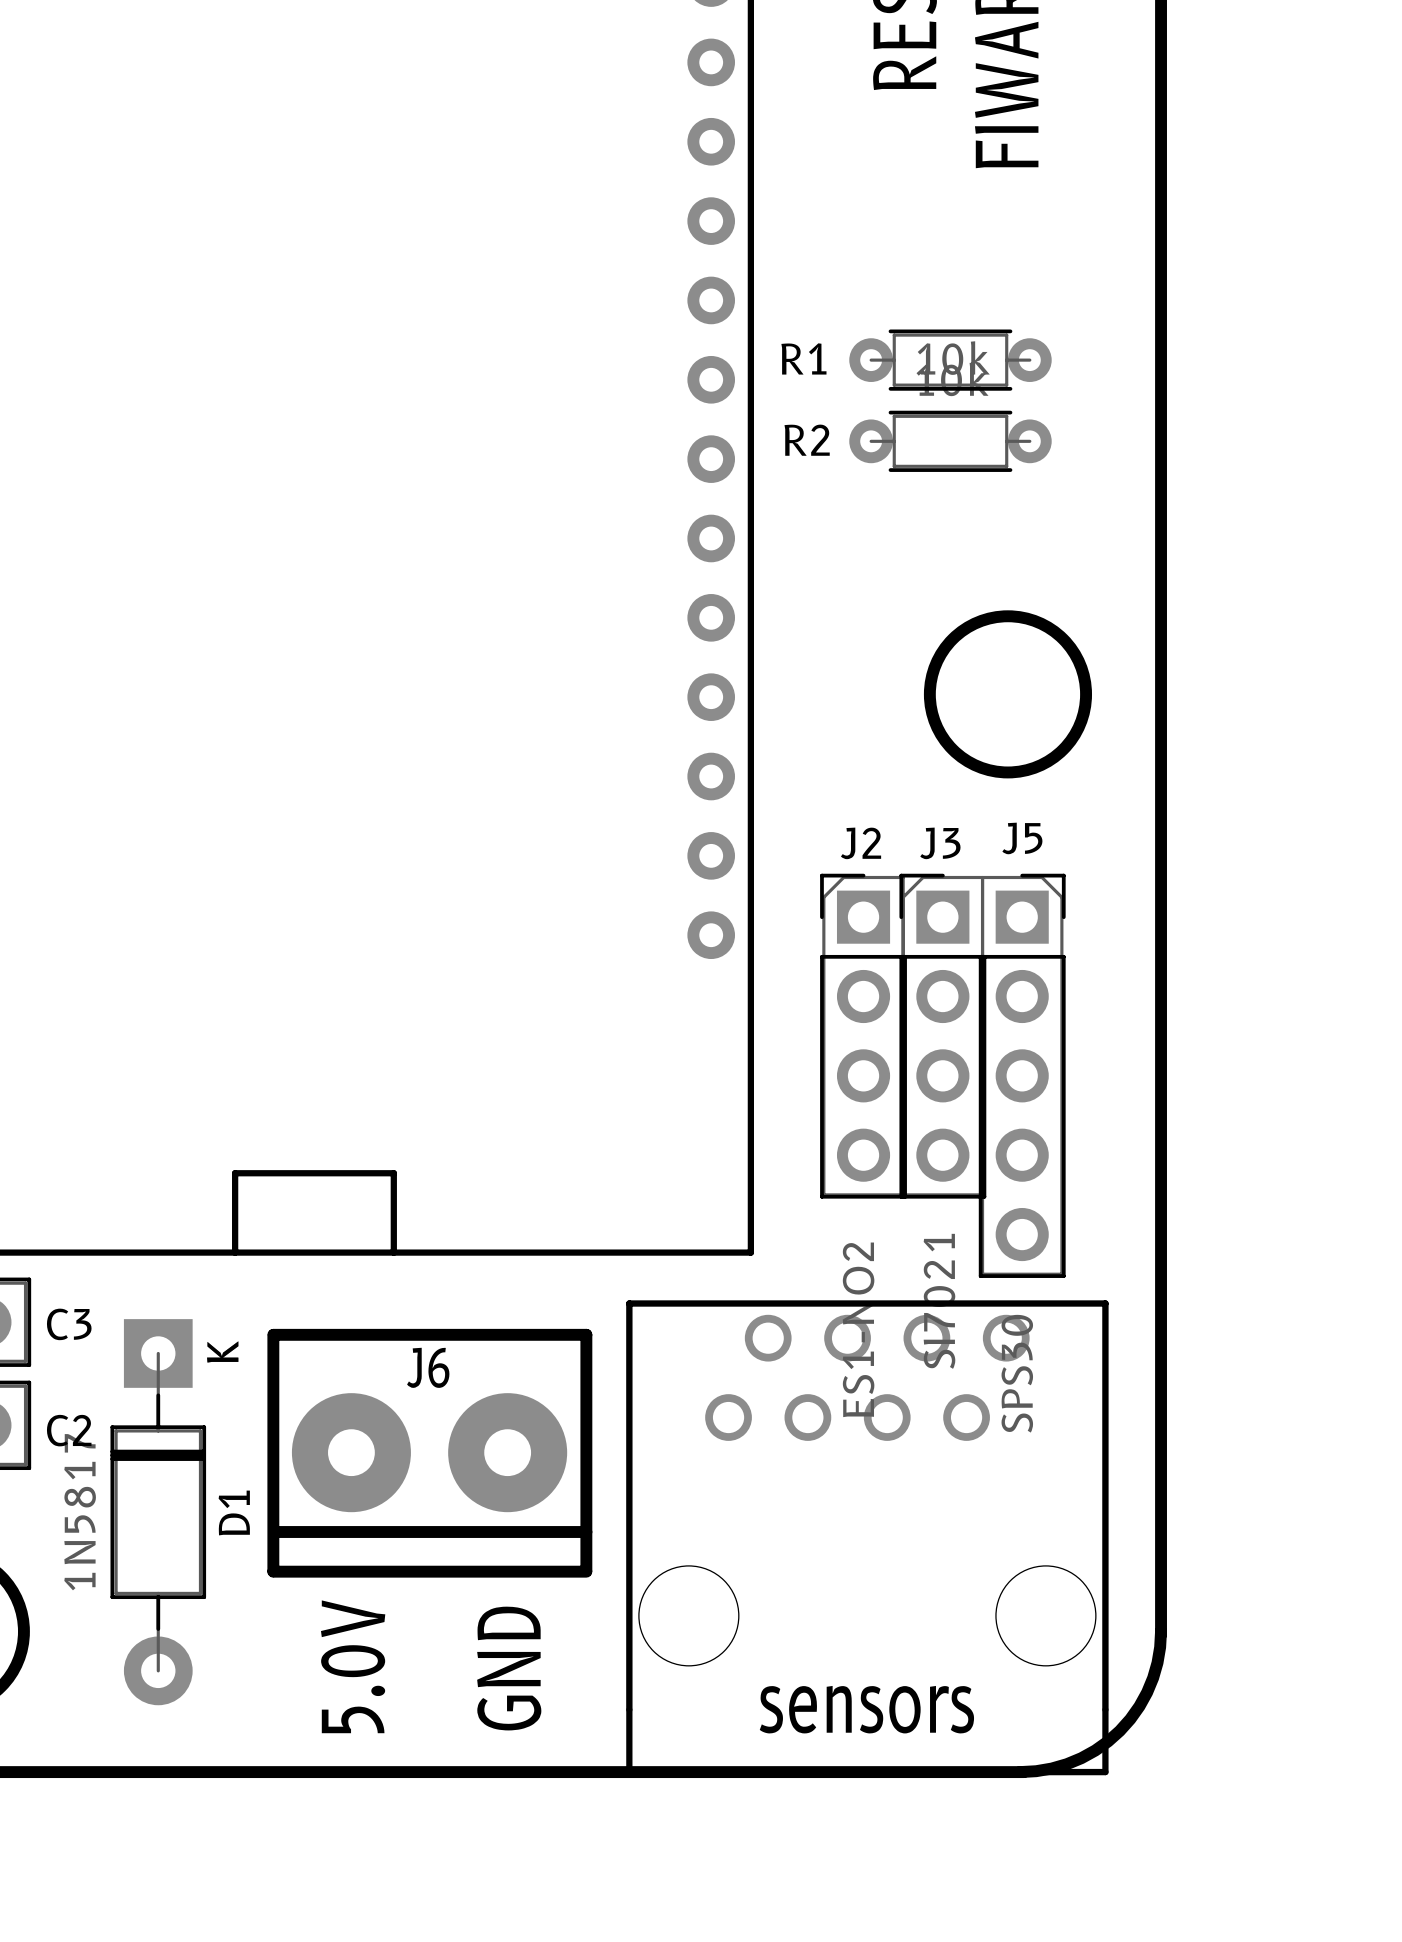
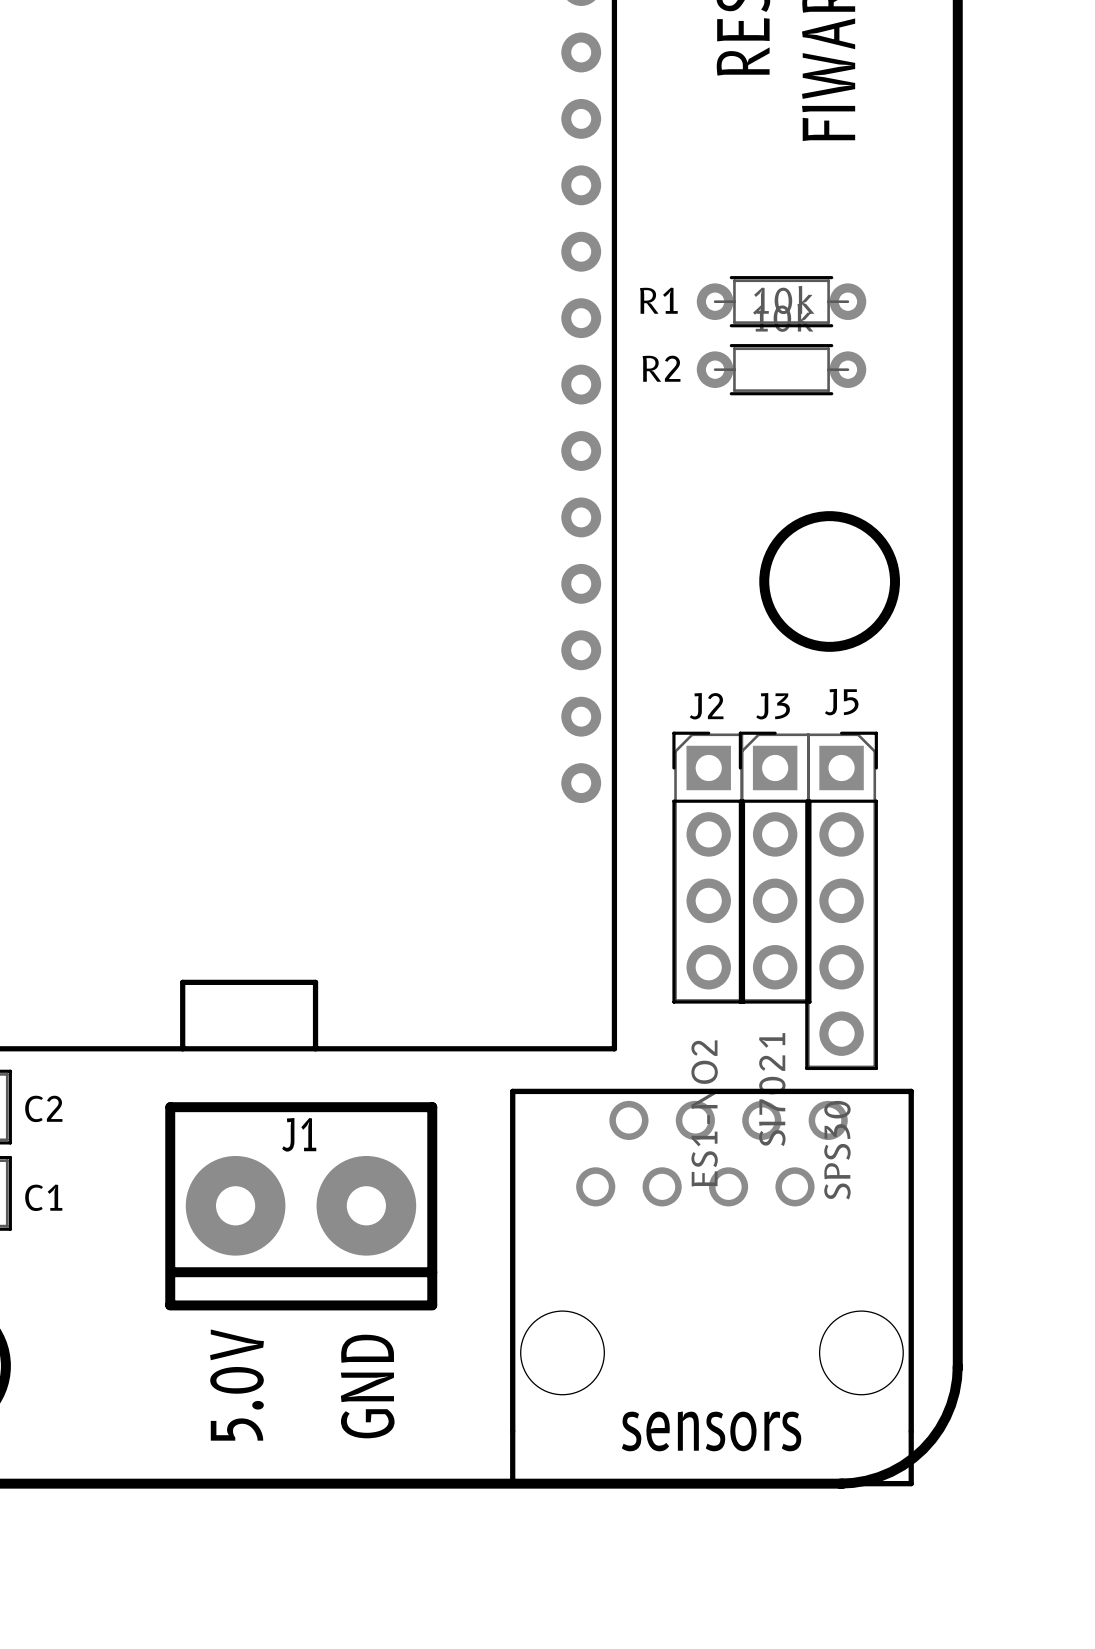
C3 name: C3 (69, 1324) -> C2 (43, 1108)
C2 name: C2 (69, 1430) -> C1 (43, 1197)
J1: none -> (301, 1206)
J6: (429, 1453) -> none
D1: 1N5817 (158, 1512) -> none
text position: 5.0V (353, 1666) -> 5.0V (237, 1385)
text position: GND (509, 1668) -> GND (367, 1386)

